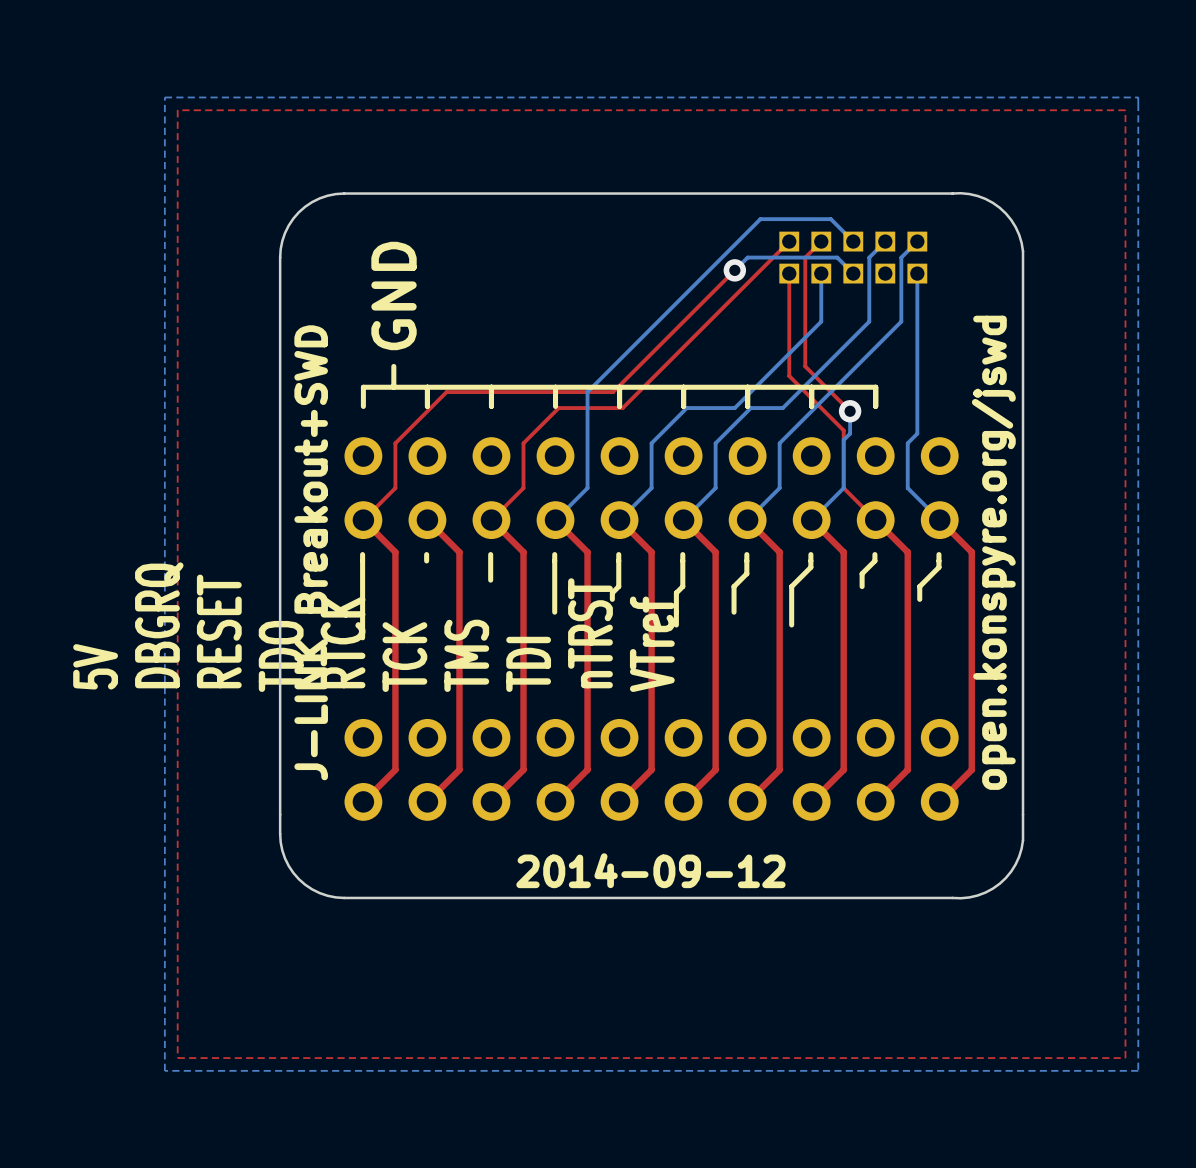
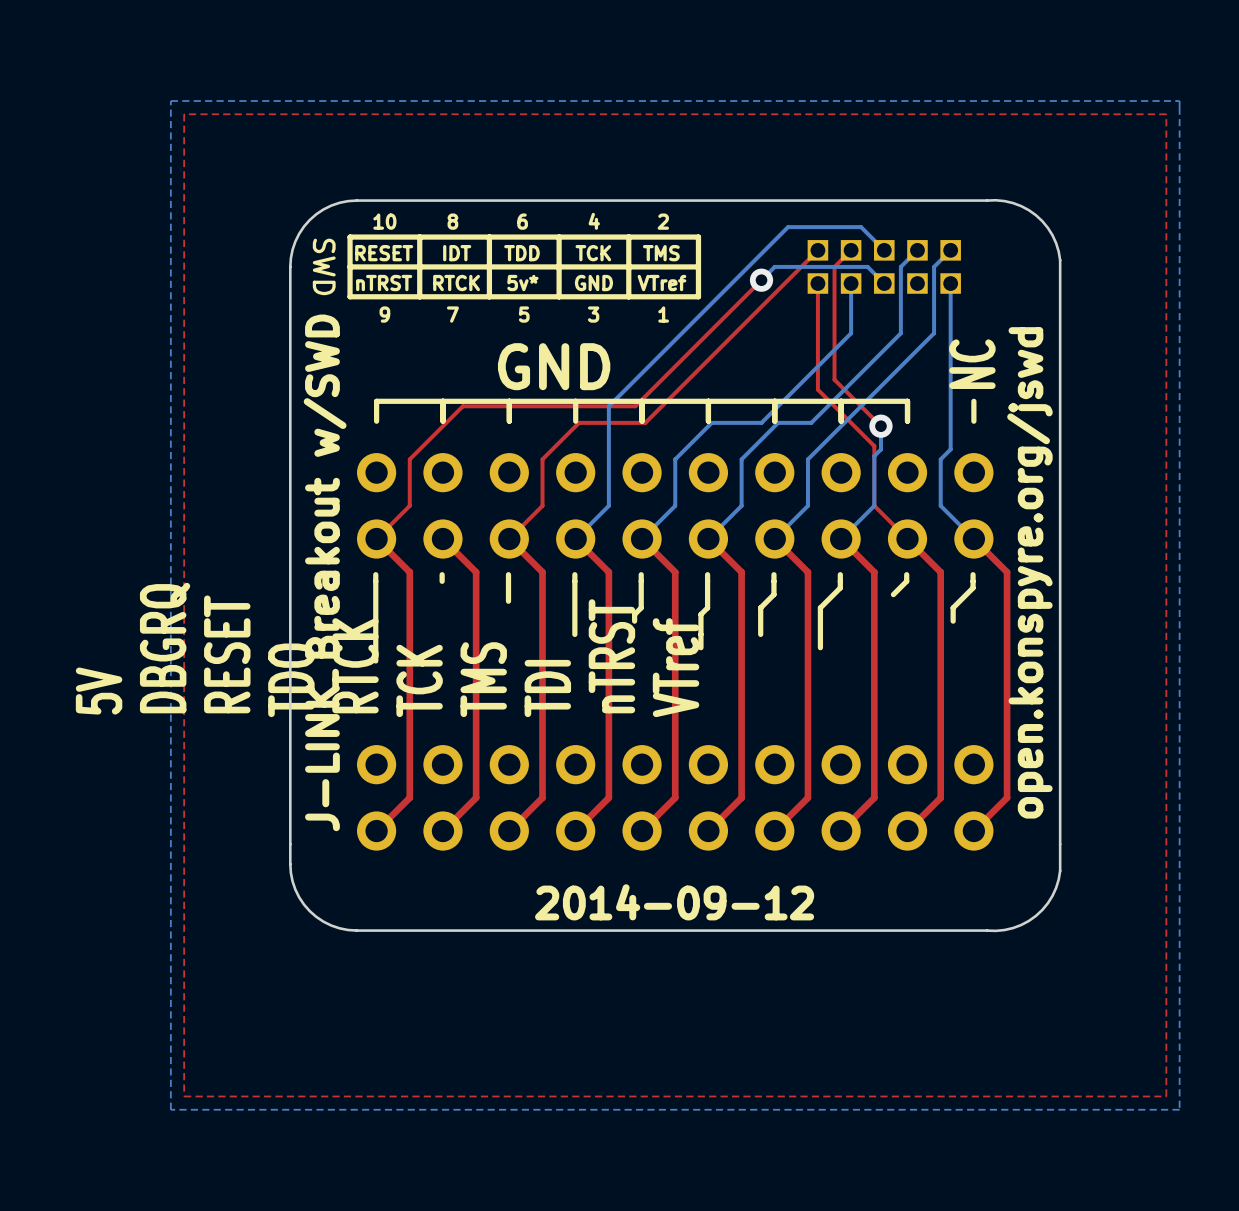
text: none -> 10 (384, 221)
text: none -> 8 (452, 221)
text: none -> 6 (522, 221)
text: none -> 4 (594, 221)
text: none -> 2 (663, 221)
line: none -> (419, 237) (419, 296)
line: none -> (489, 237) (489, 296)
line: none -> (559, 237) (559, 296)
line: none -> (628, 237) (628, 296)
line: none -> (698, 237) (698, 296) (350, 296) (350, 237) (698, 237)
text: none -> RESET (384, 253)
text: none -> IDT (457, 253)
text: none -> TDD (521, 253)
text: none -> TCK (593, 253)
text: none -> TMS (661, 253)
text: none -> SWD (324, 266)
line: none -> (698, 266) (350, 266)
text: none -> nTRST (384, 283)
text: none -> RTCK (456, 283)
text: none -> 5v* (522, 283)
text: none -> GND (593, 283)
text: none -> VTref (661, 283)
text: GND (394, 295) -> none
text: none -> 9 (384, 314)
text: none -> 7 (452, 314)
text: none -> 5 (524, 314)
text: none -> 3 (593, 314)
text: none -> 1 (663, 314)
text: none -> NC (972, 364)
text: none -> GND (554, 366)
line: (393, 366) (393, 387) -> none
line: none -> (973, 401) (973, 421)
text: J-LINK Breakout+SWD (311, 552) -> J-LINK Breakout w/SWD (325, 572)
line: (862, 573) (862, 586) -> none

